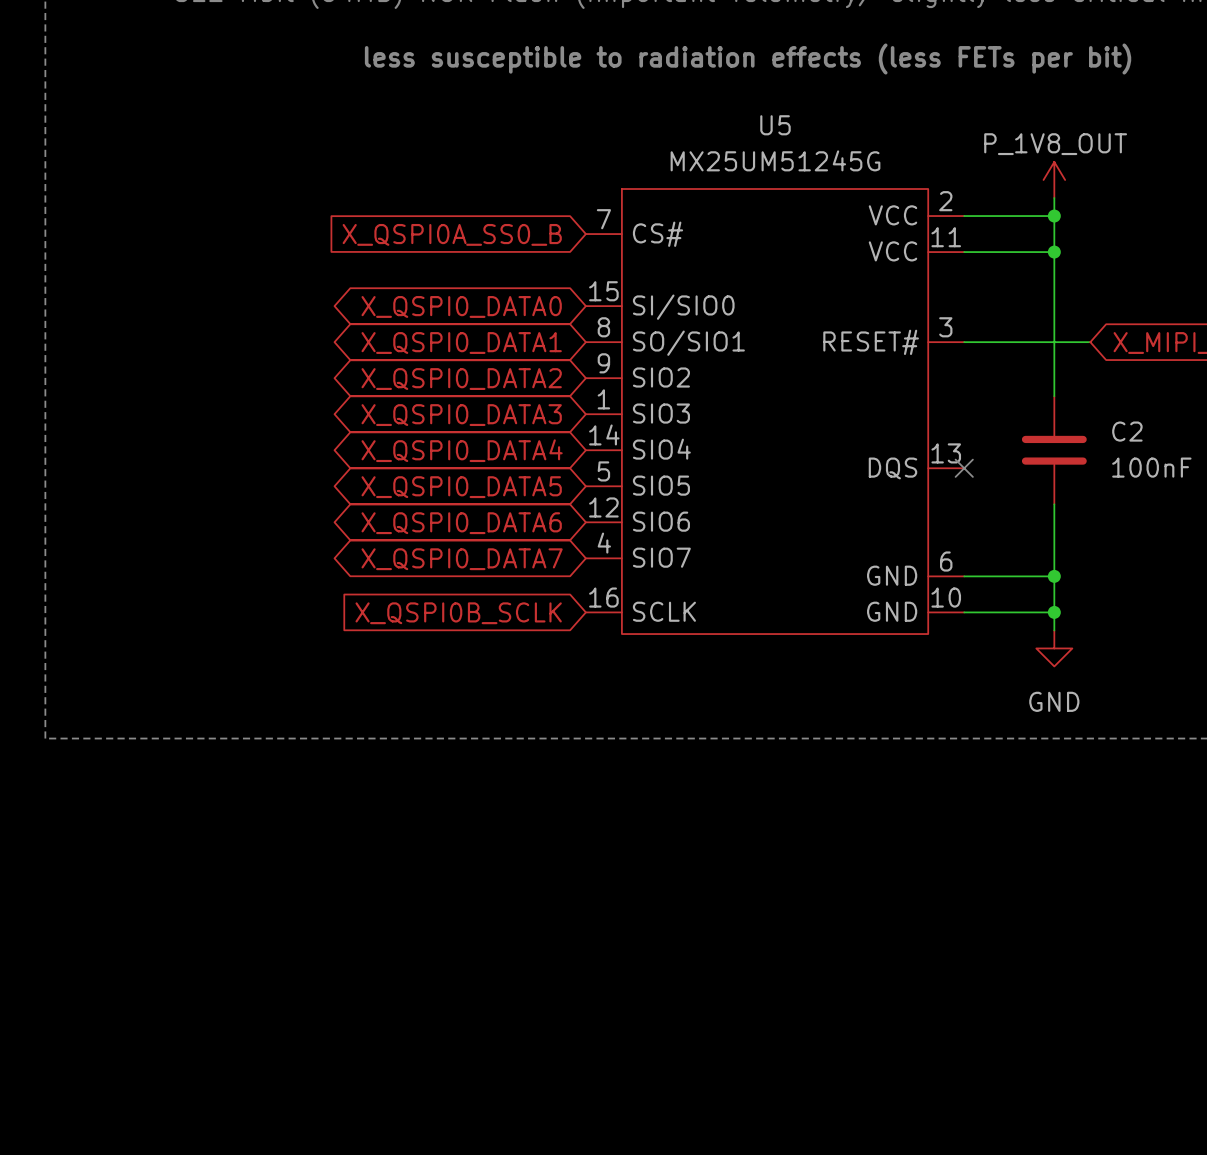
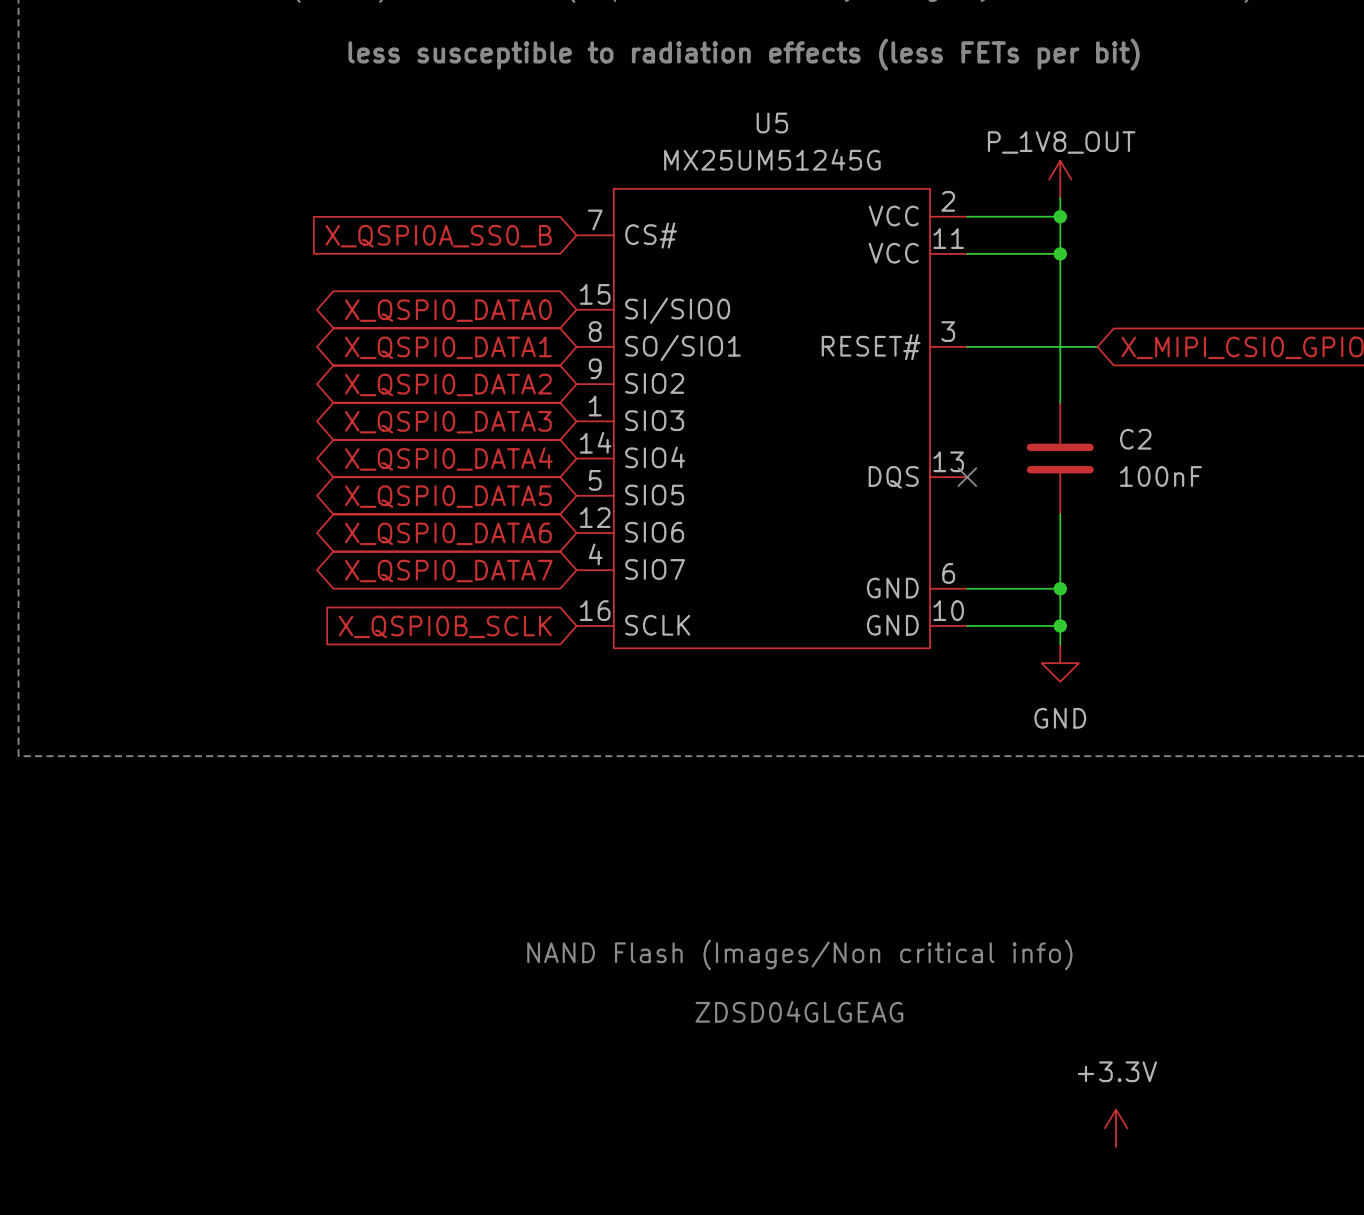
text: none -> NAND Flash (Images/Non critical info) (799, 954)
text: none -> ZDSD04GLGEAG (799, 1011)
power symbol: none -> +3.3V (1116, 1128)

